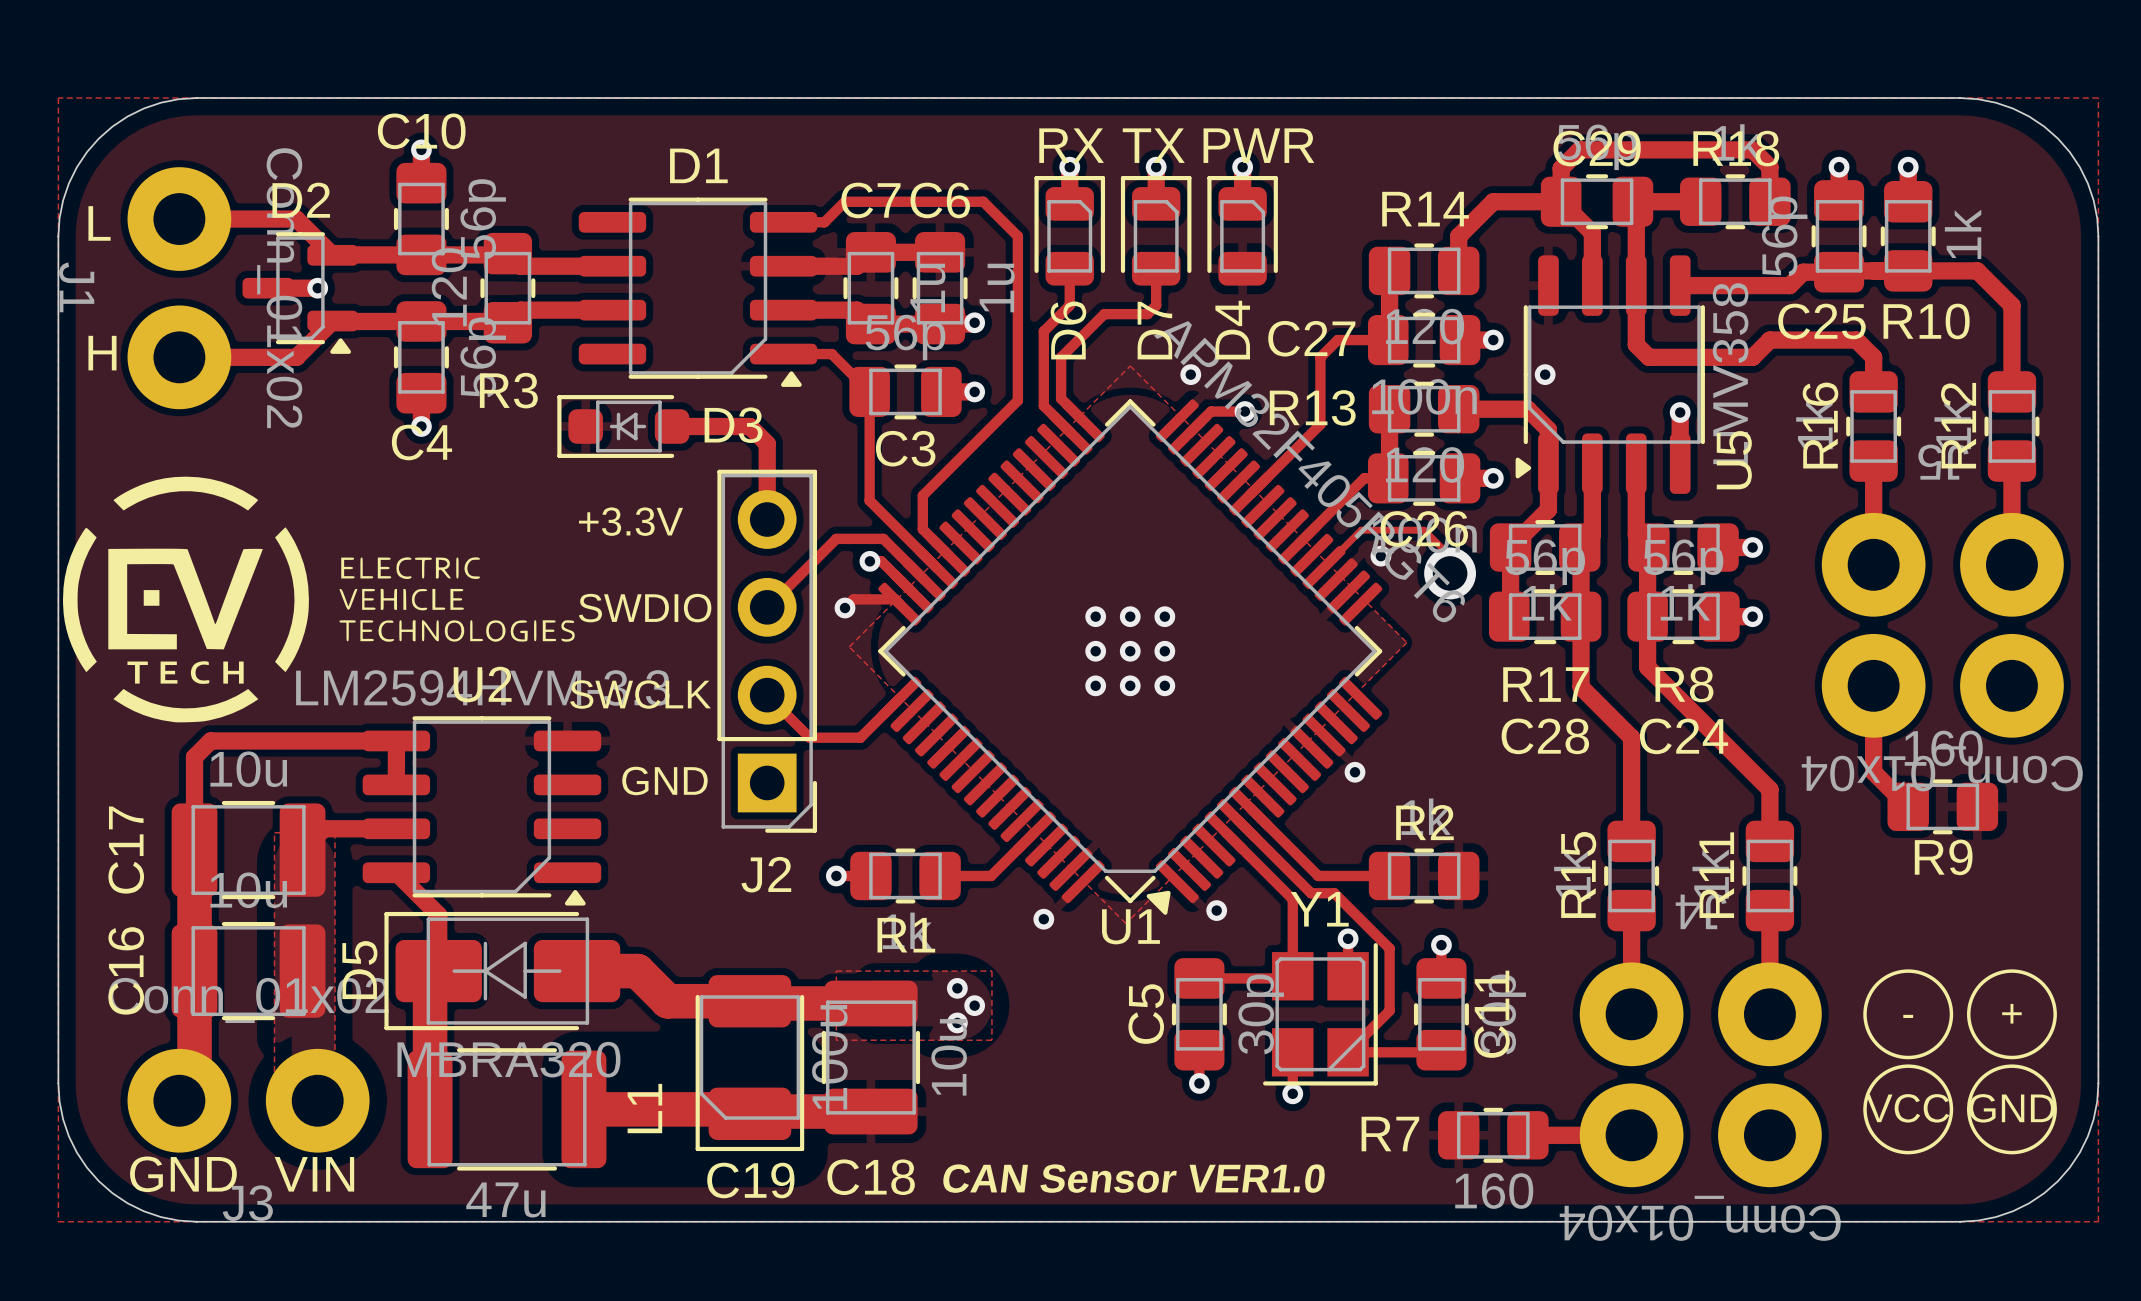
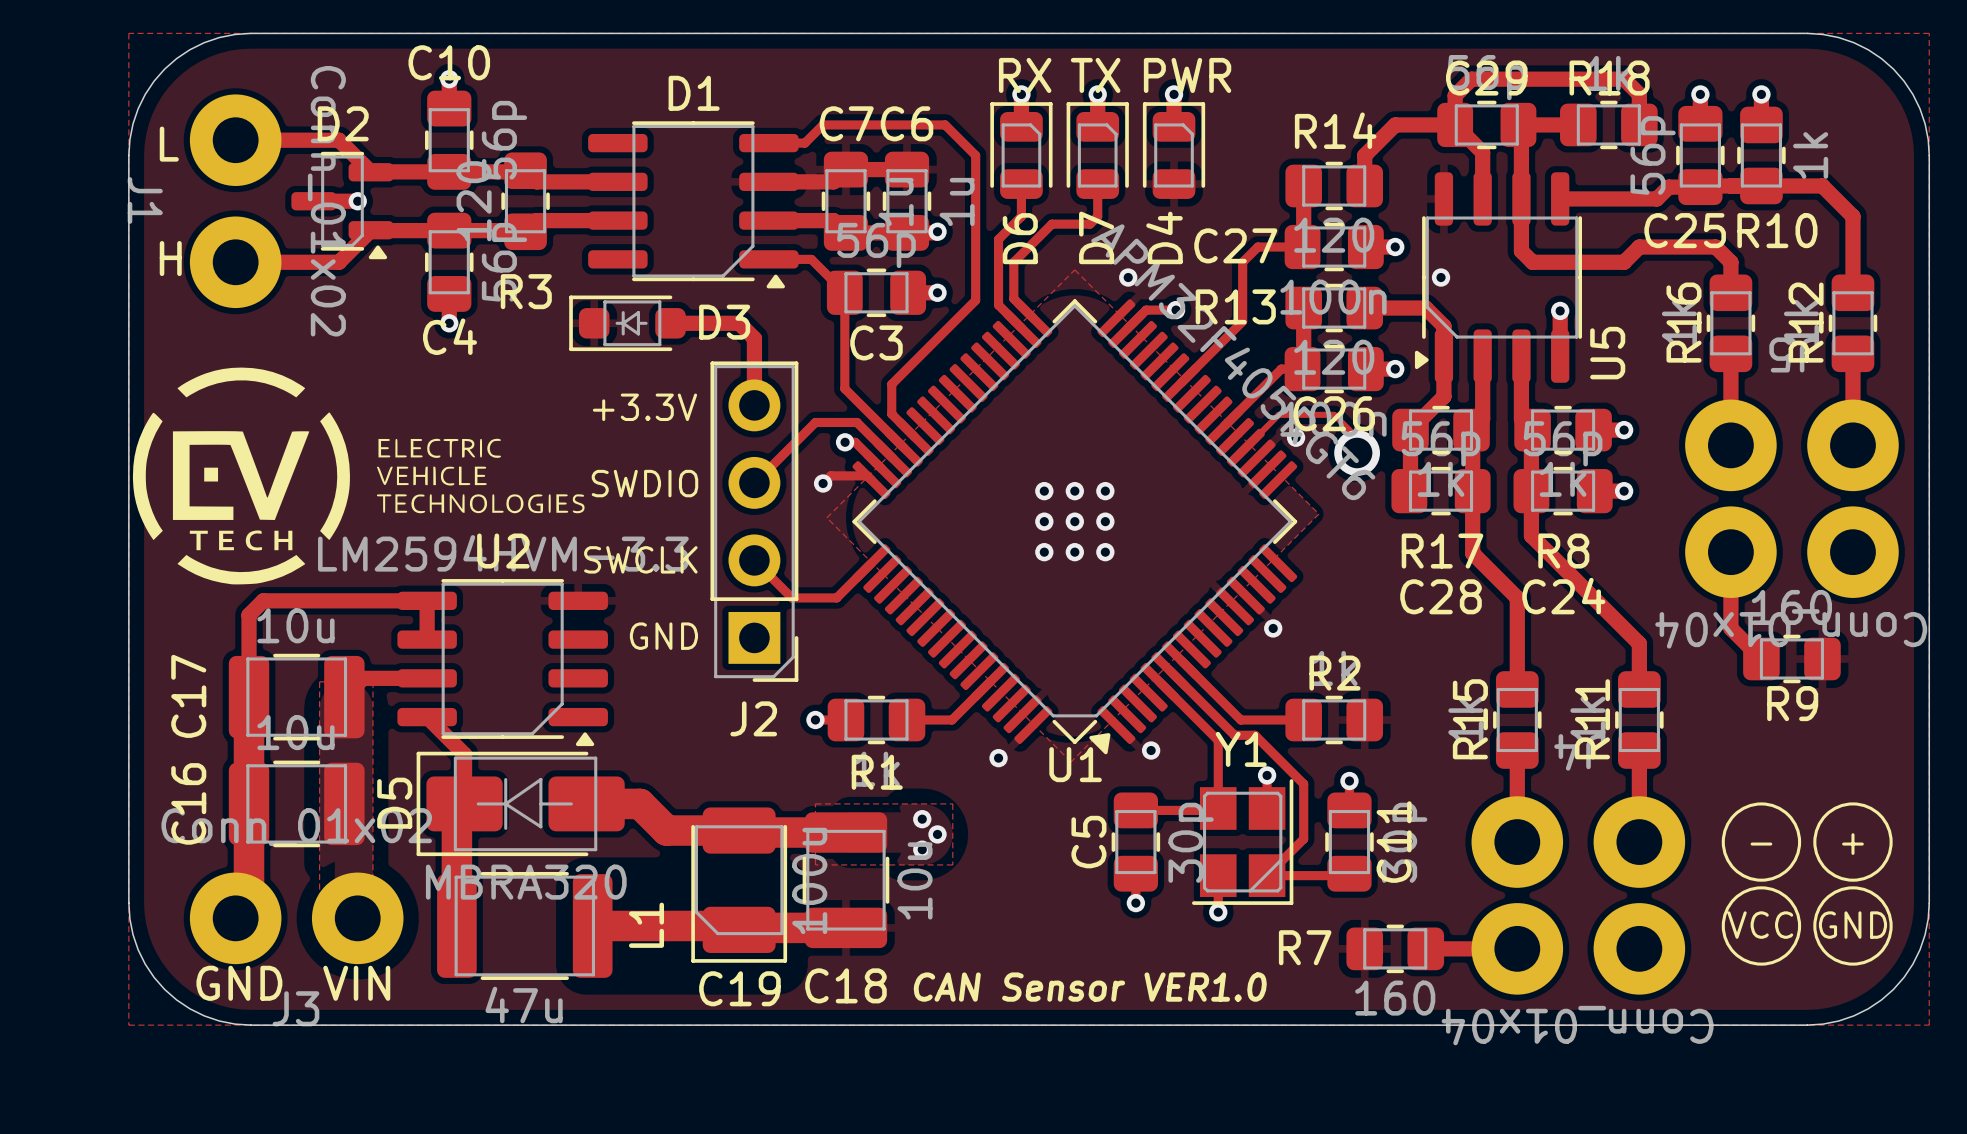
U5 value: LMV358 (1730, 373) -> none

